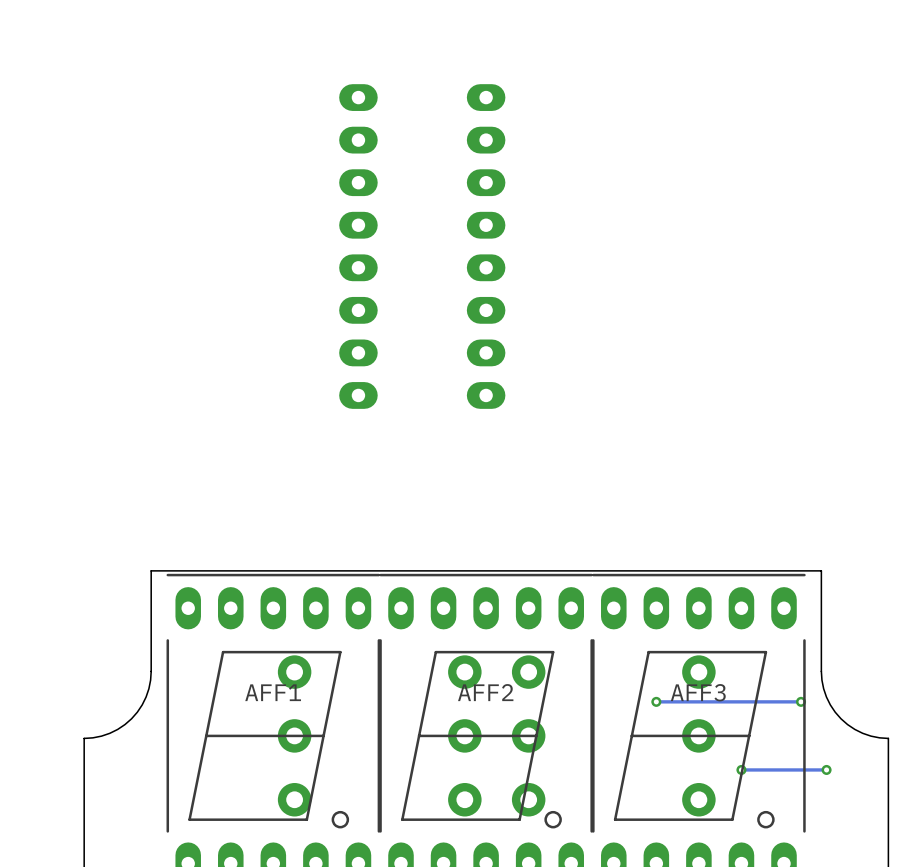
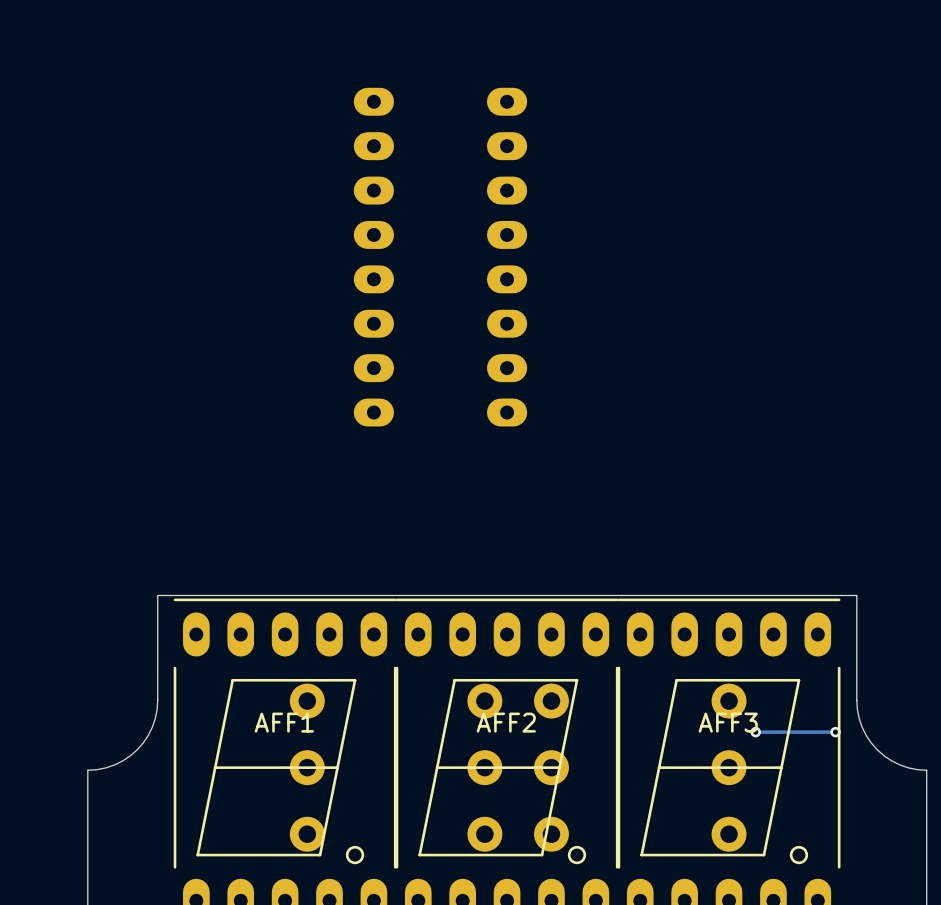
via: (656, 701) -> none
track: (724, 701) (656, 701) -> none
via: none -> (755, 732)
via: (741, 769) -> none
track: (826, 769) (741, 769) -> none
via: (826, 769) -> none

